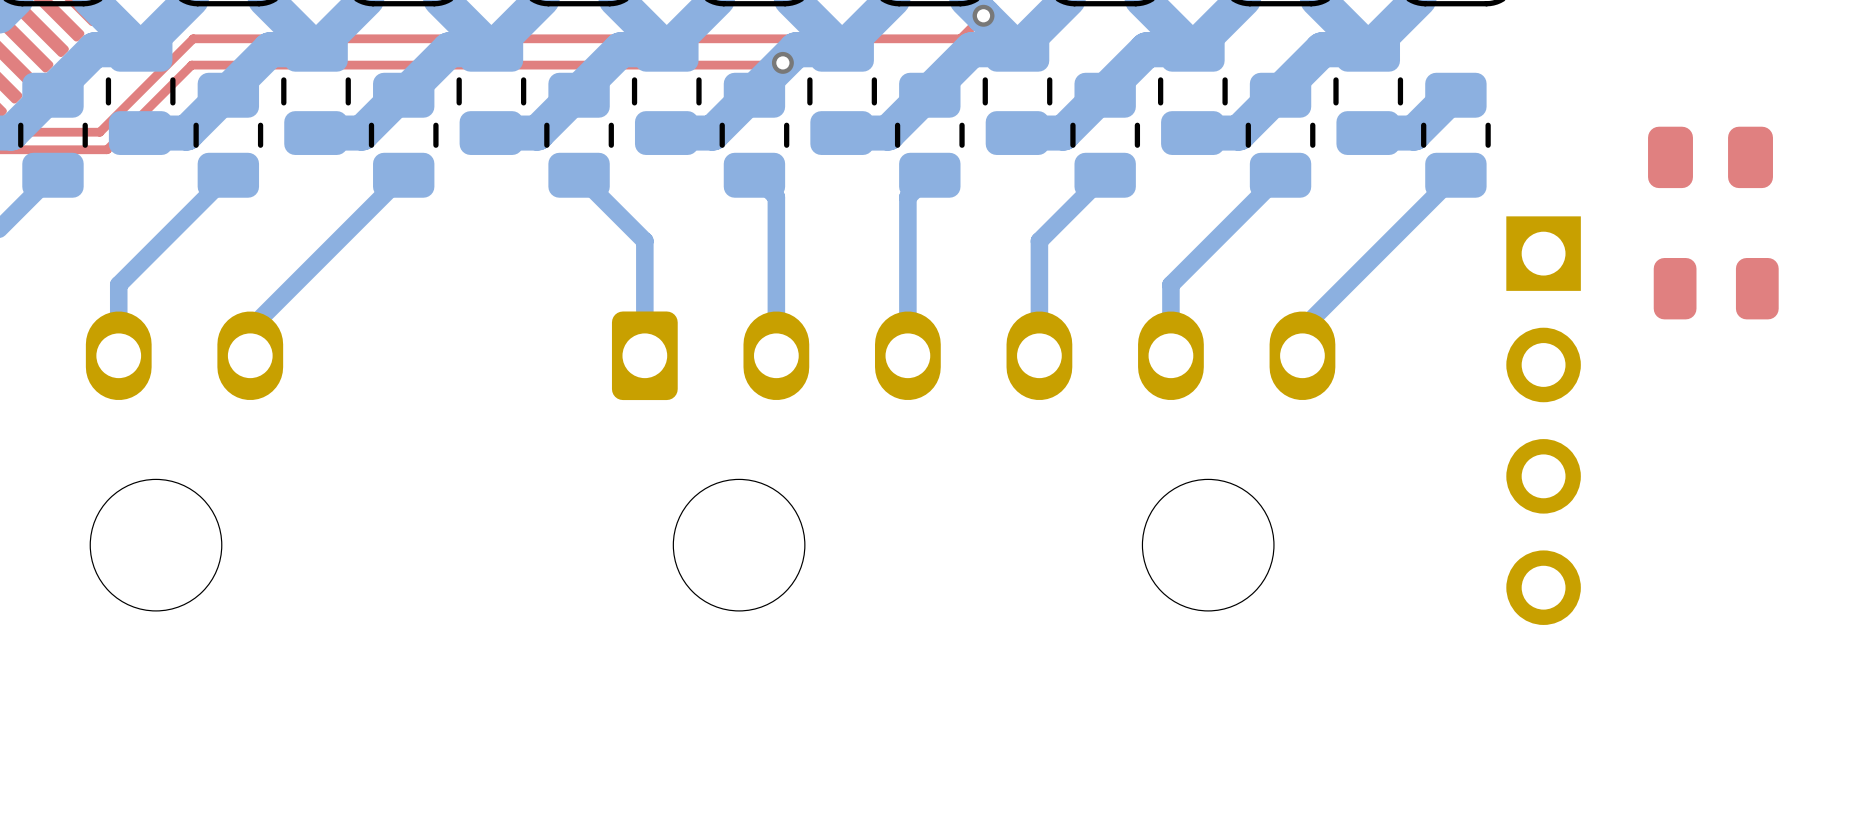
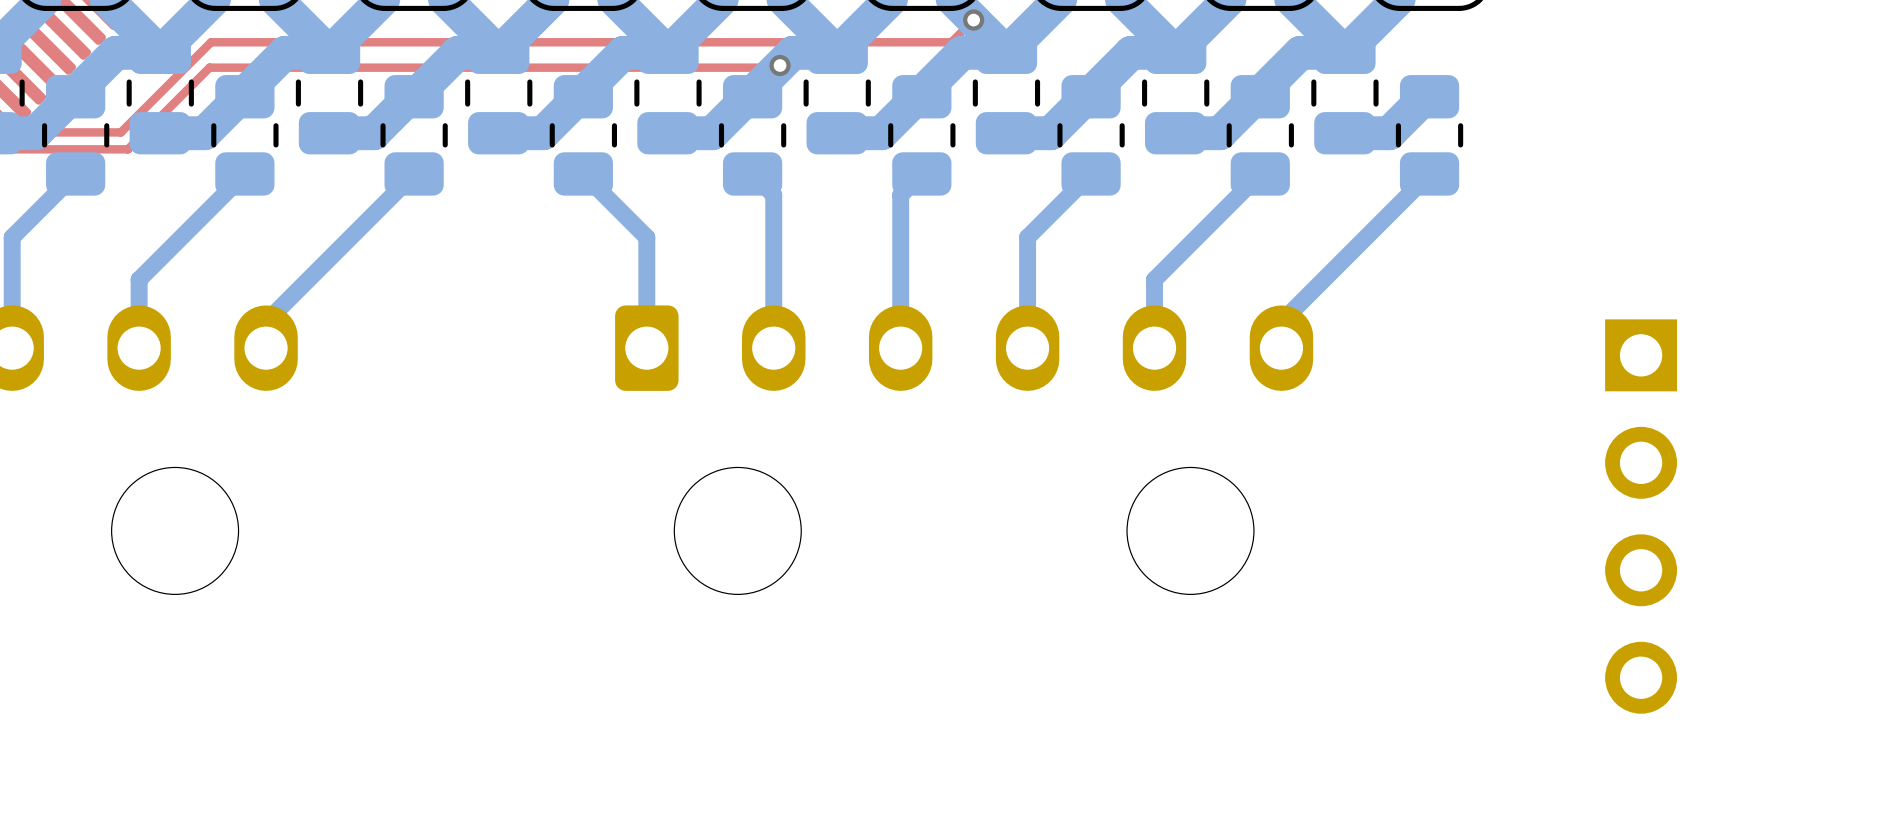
part: (1710, 157) -> none
part: (1716, 288) -> none
part position: (1543, 420) -> (1641, 516)

